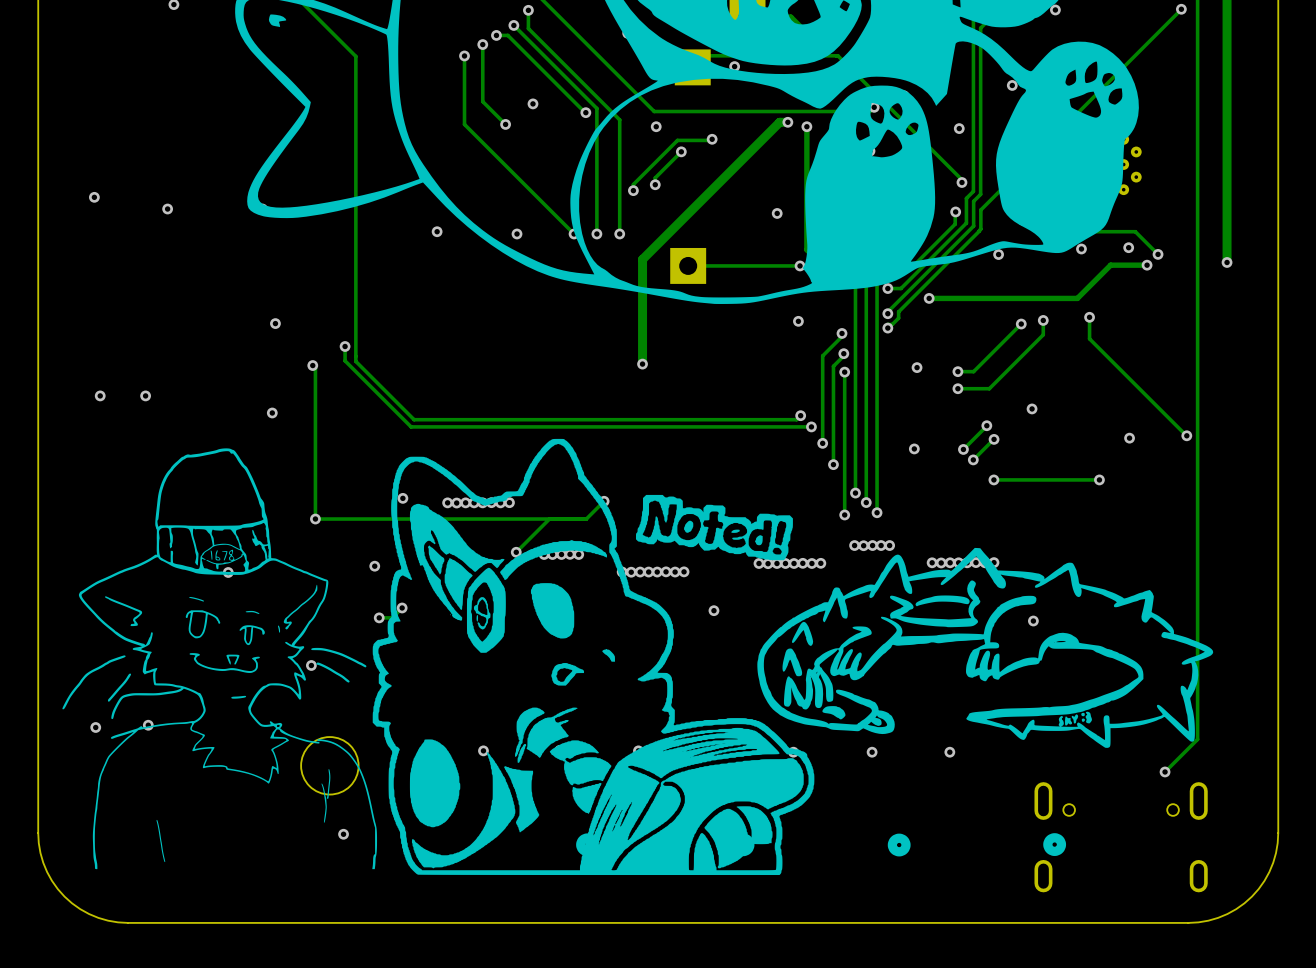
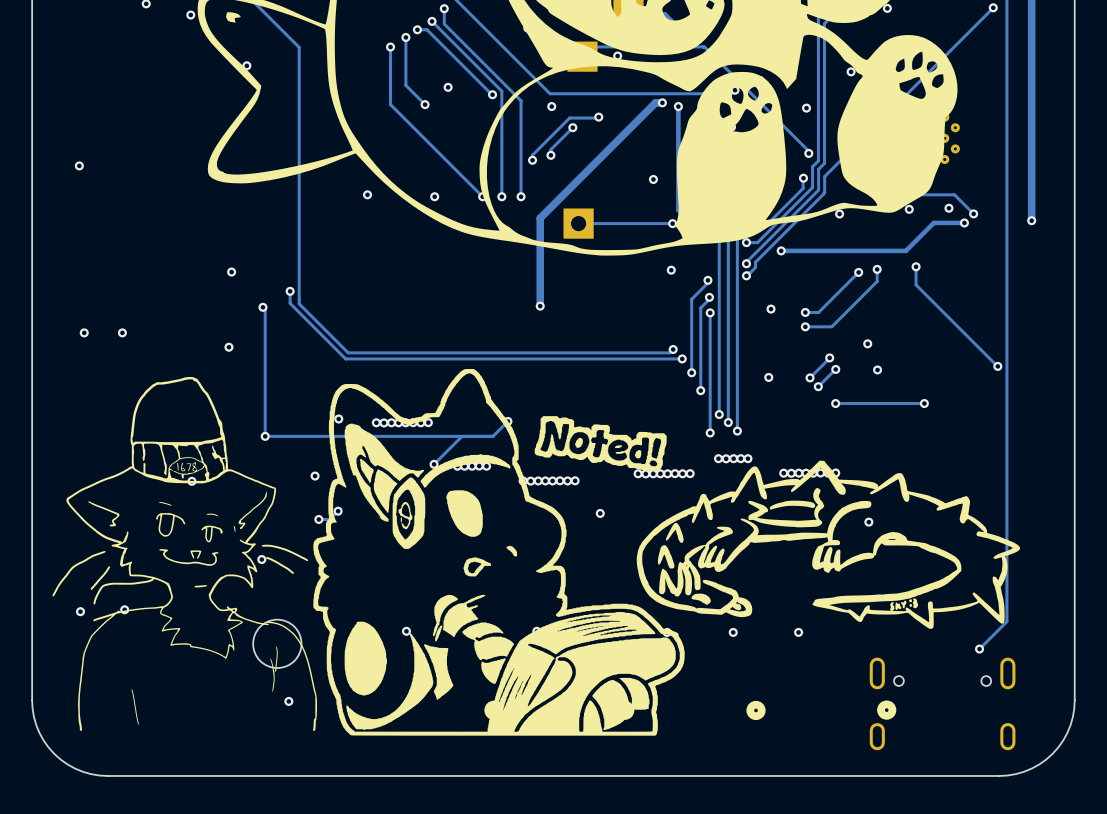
via: none -> (190, 15)
via: none -> (246, 65)
via: (167, 209) -> none
via position: (1129, 438) -> (877, 369)

